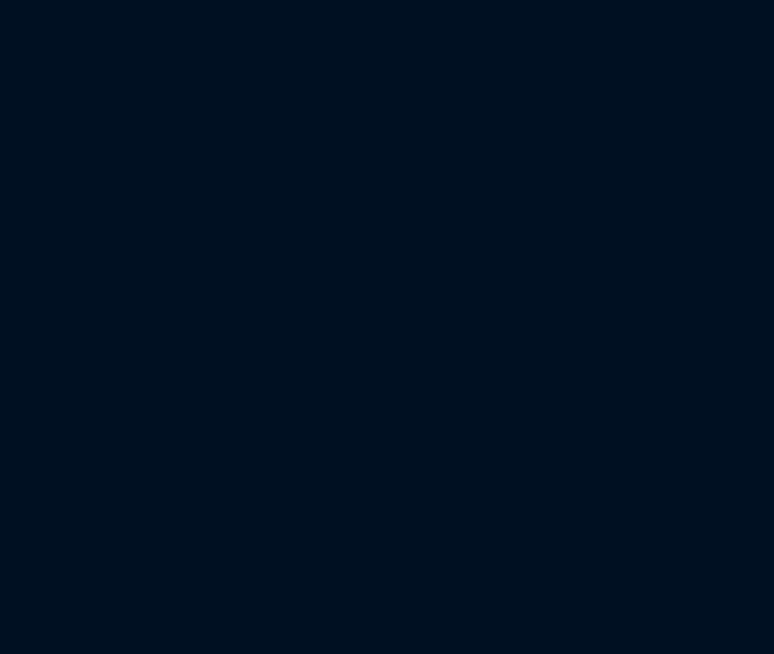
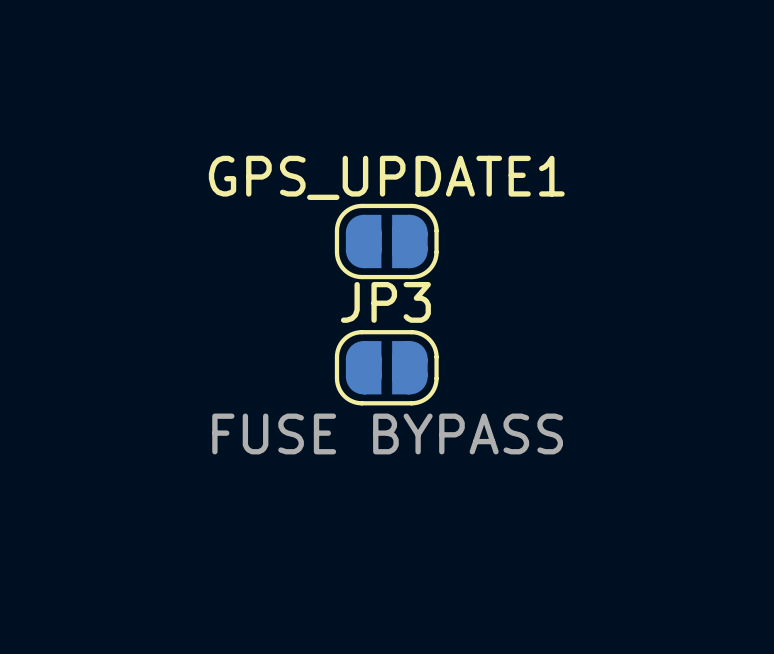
GPS_UPDATE1: none -> (386, 241)
JP3: none -> FUSE BYPASS (386, 367)

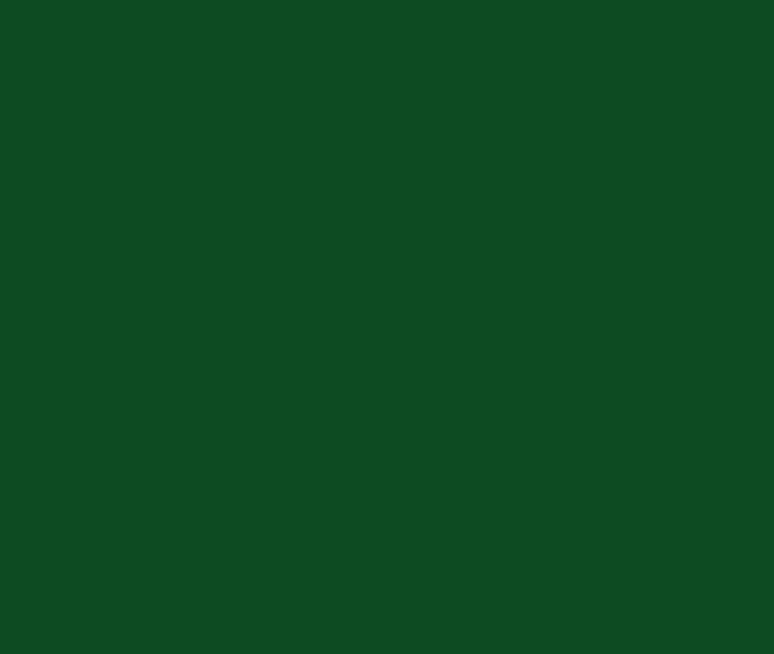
GPS_UPDATE1: (386, 241) -> none
JP3: FUSE BYPASS (386, 367) -> none

